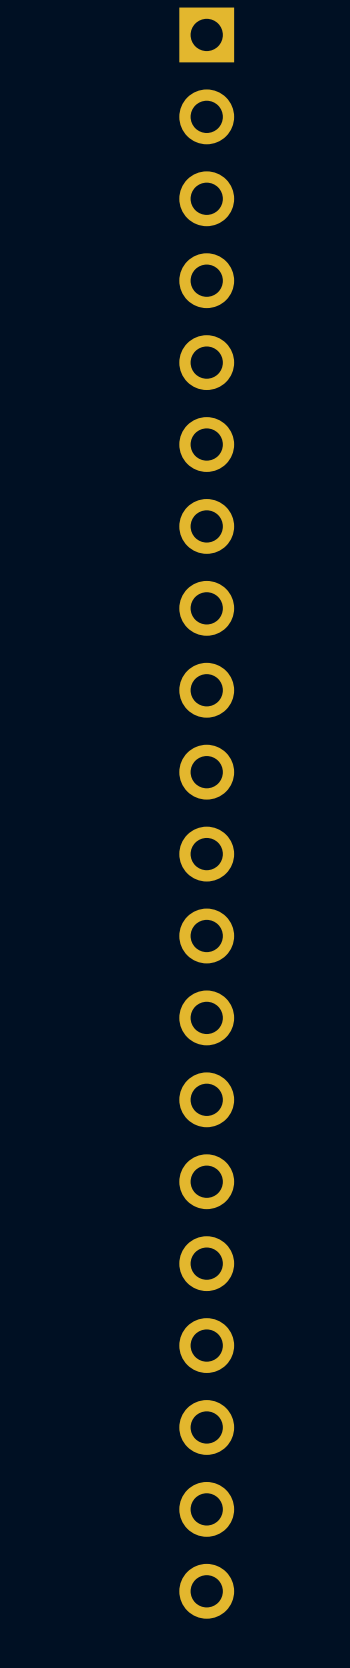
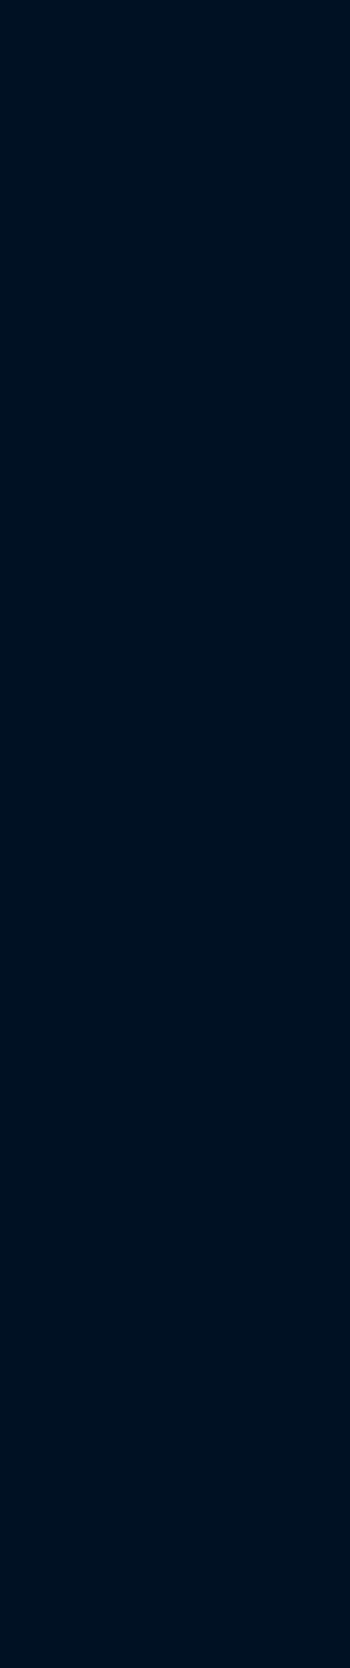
part: (206, 813) -> none

